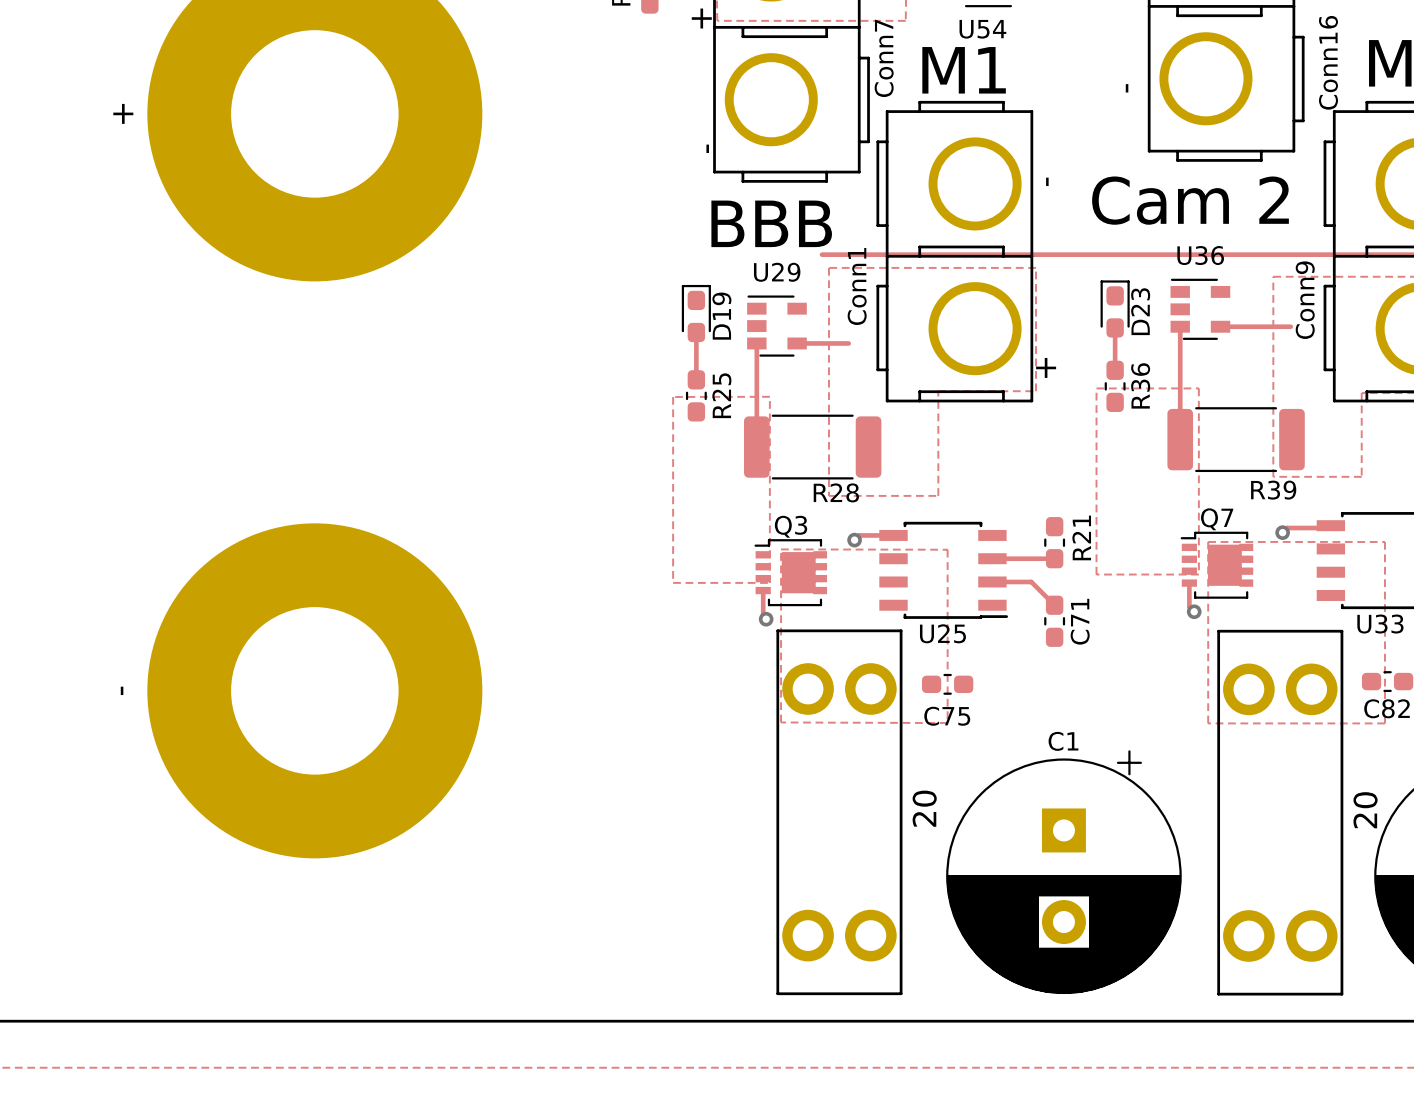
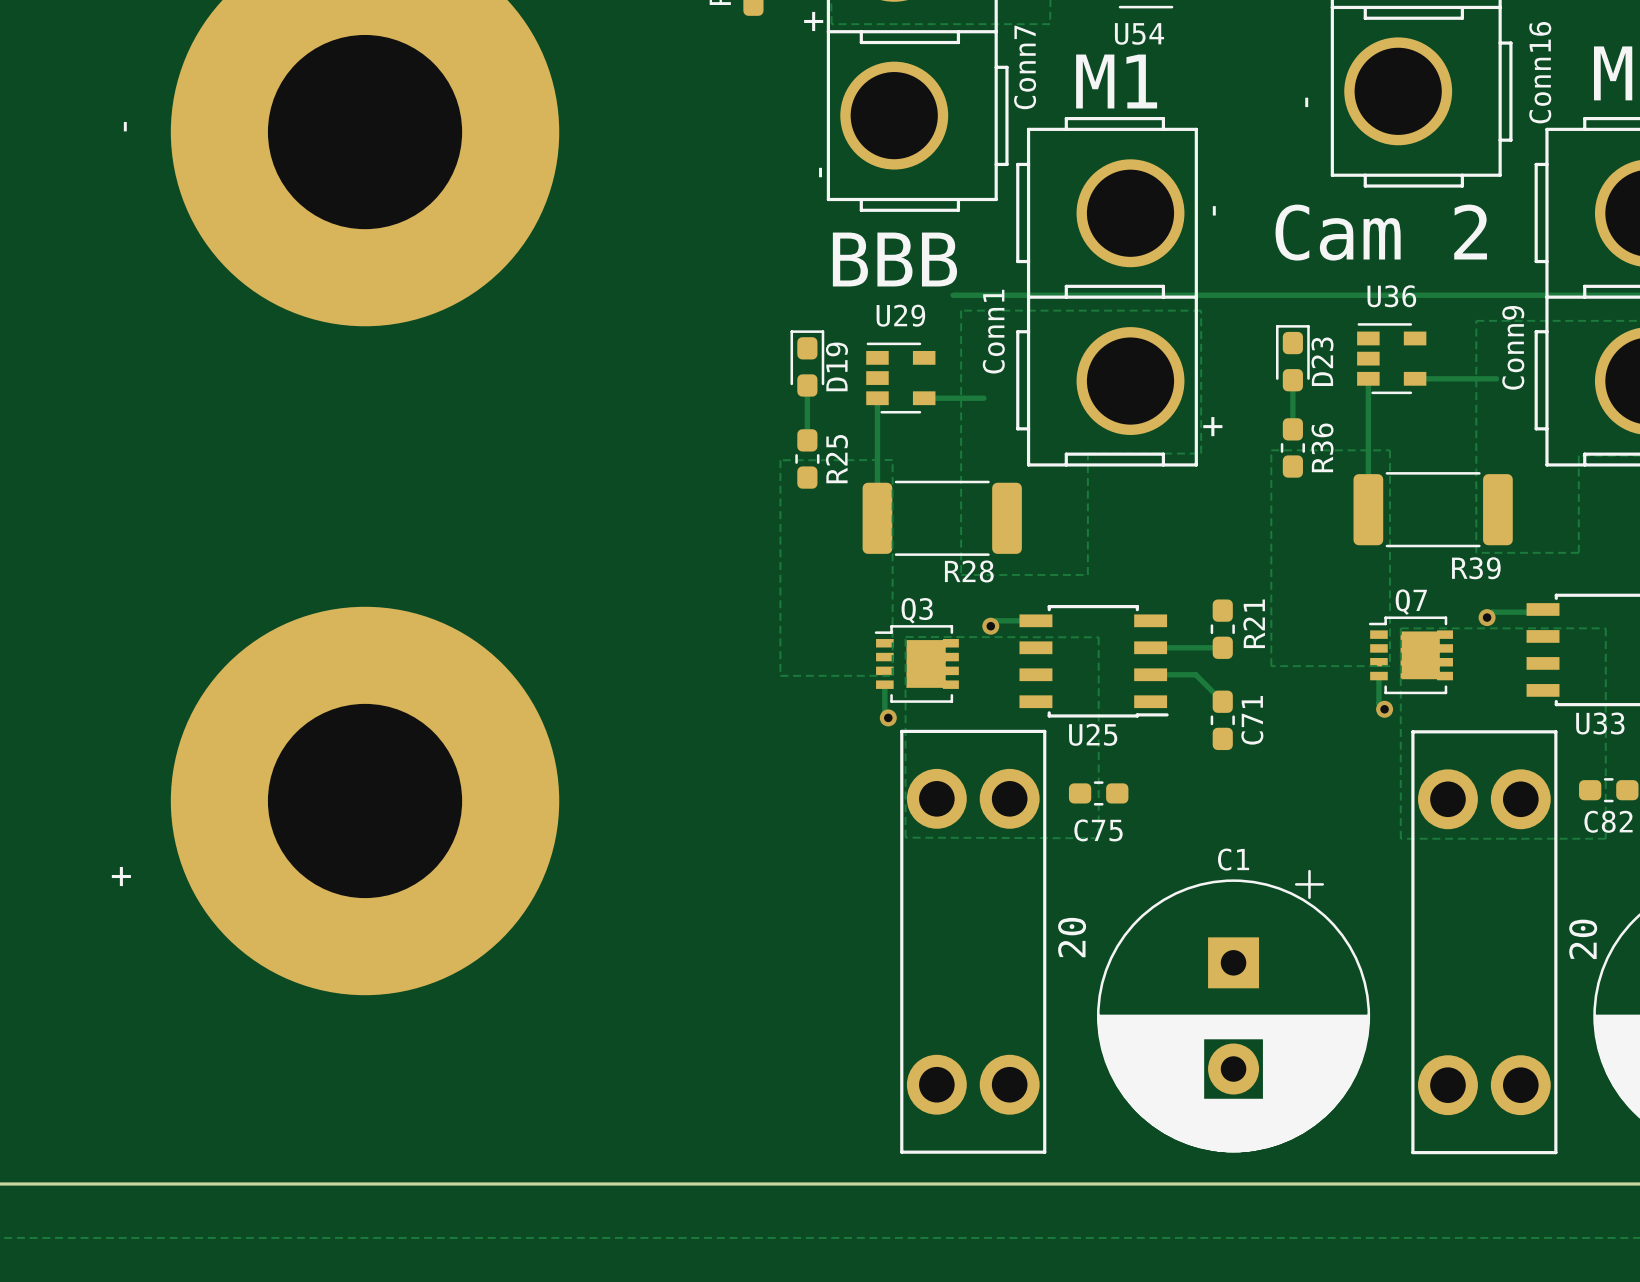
text: + (123, 113) -> - (125, 126)
text: - (122, 690) -> none
text: none -> + (121, 876)

